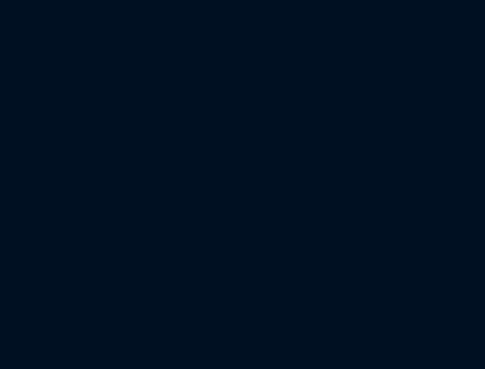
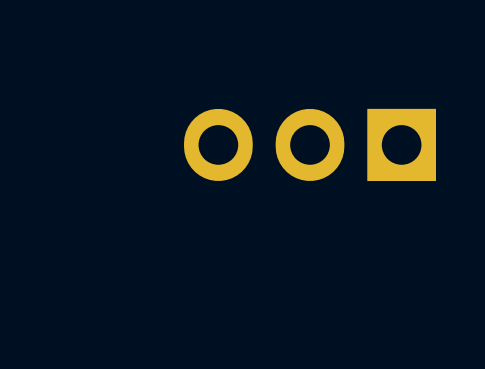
part: none -> (310, 144)

